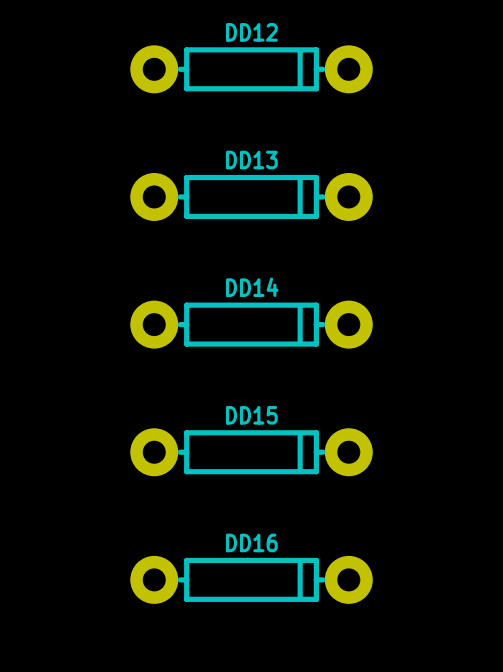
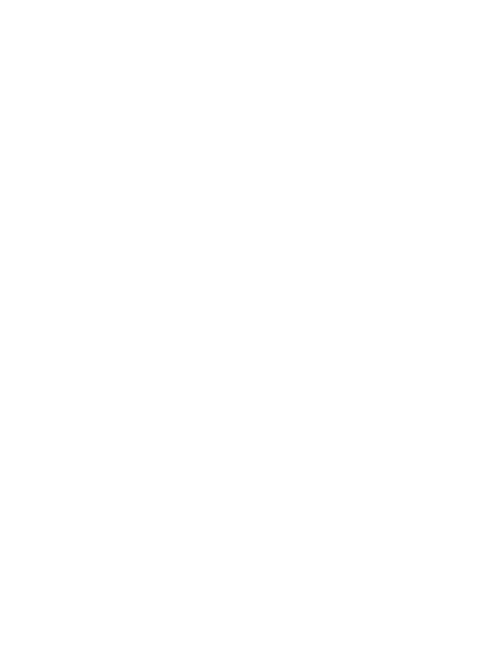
DD12: (251, 69) -> none
DD13: (251, 196) -> none
DD14: (251, 324) -> none
DD15: (251, 452) -> none
DD16: (251, 579) -> none

